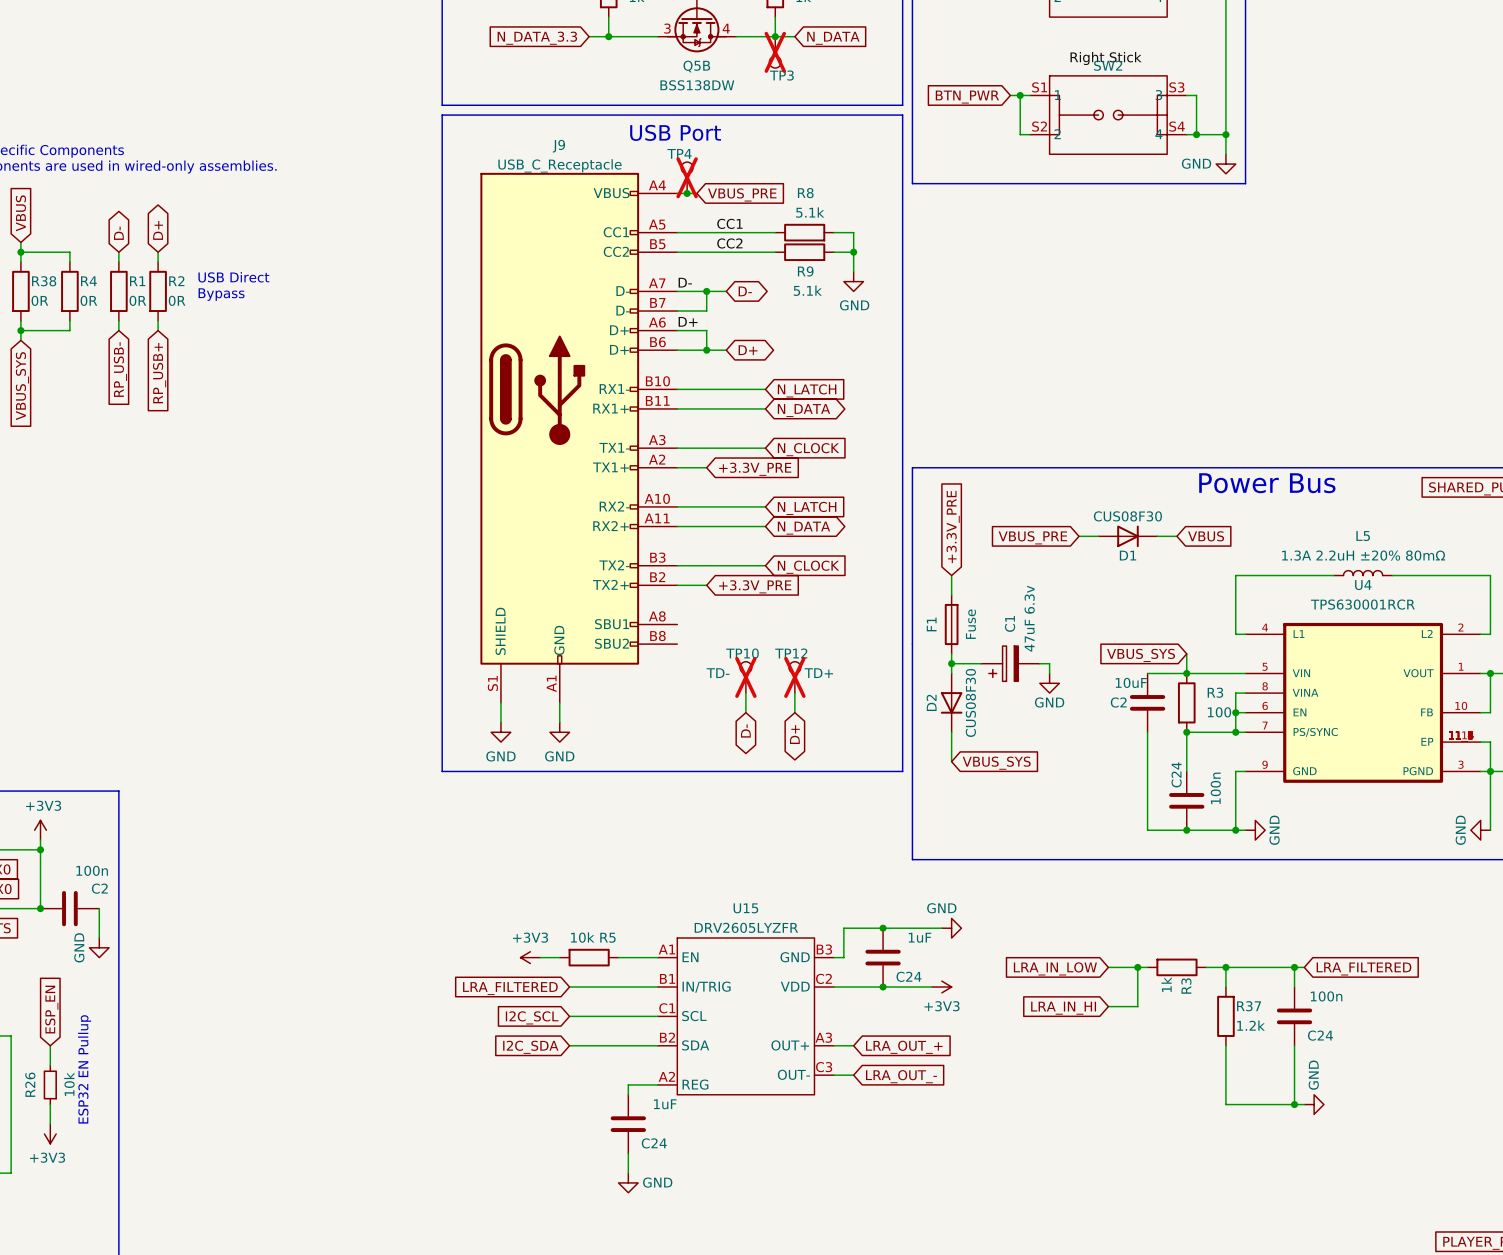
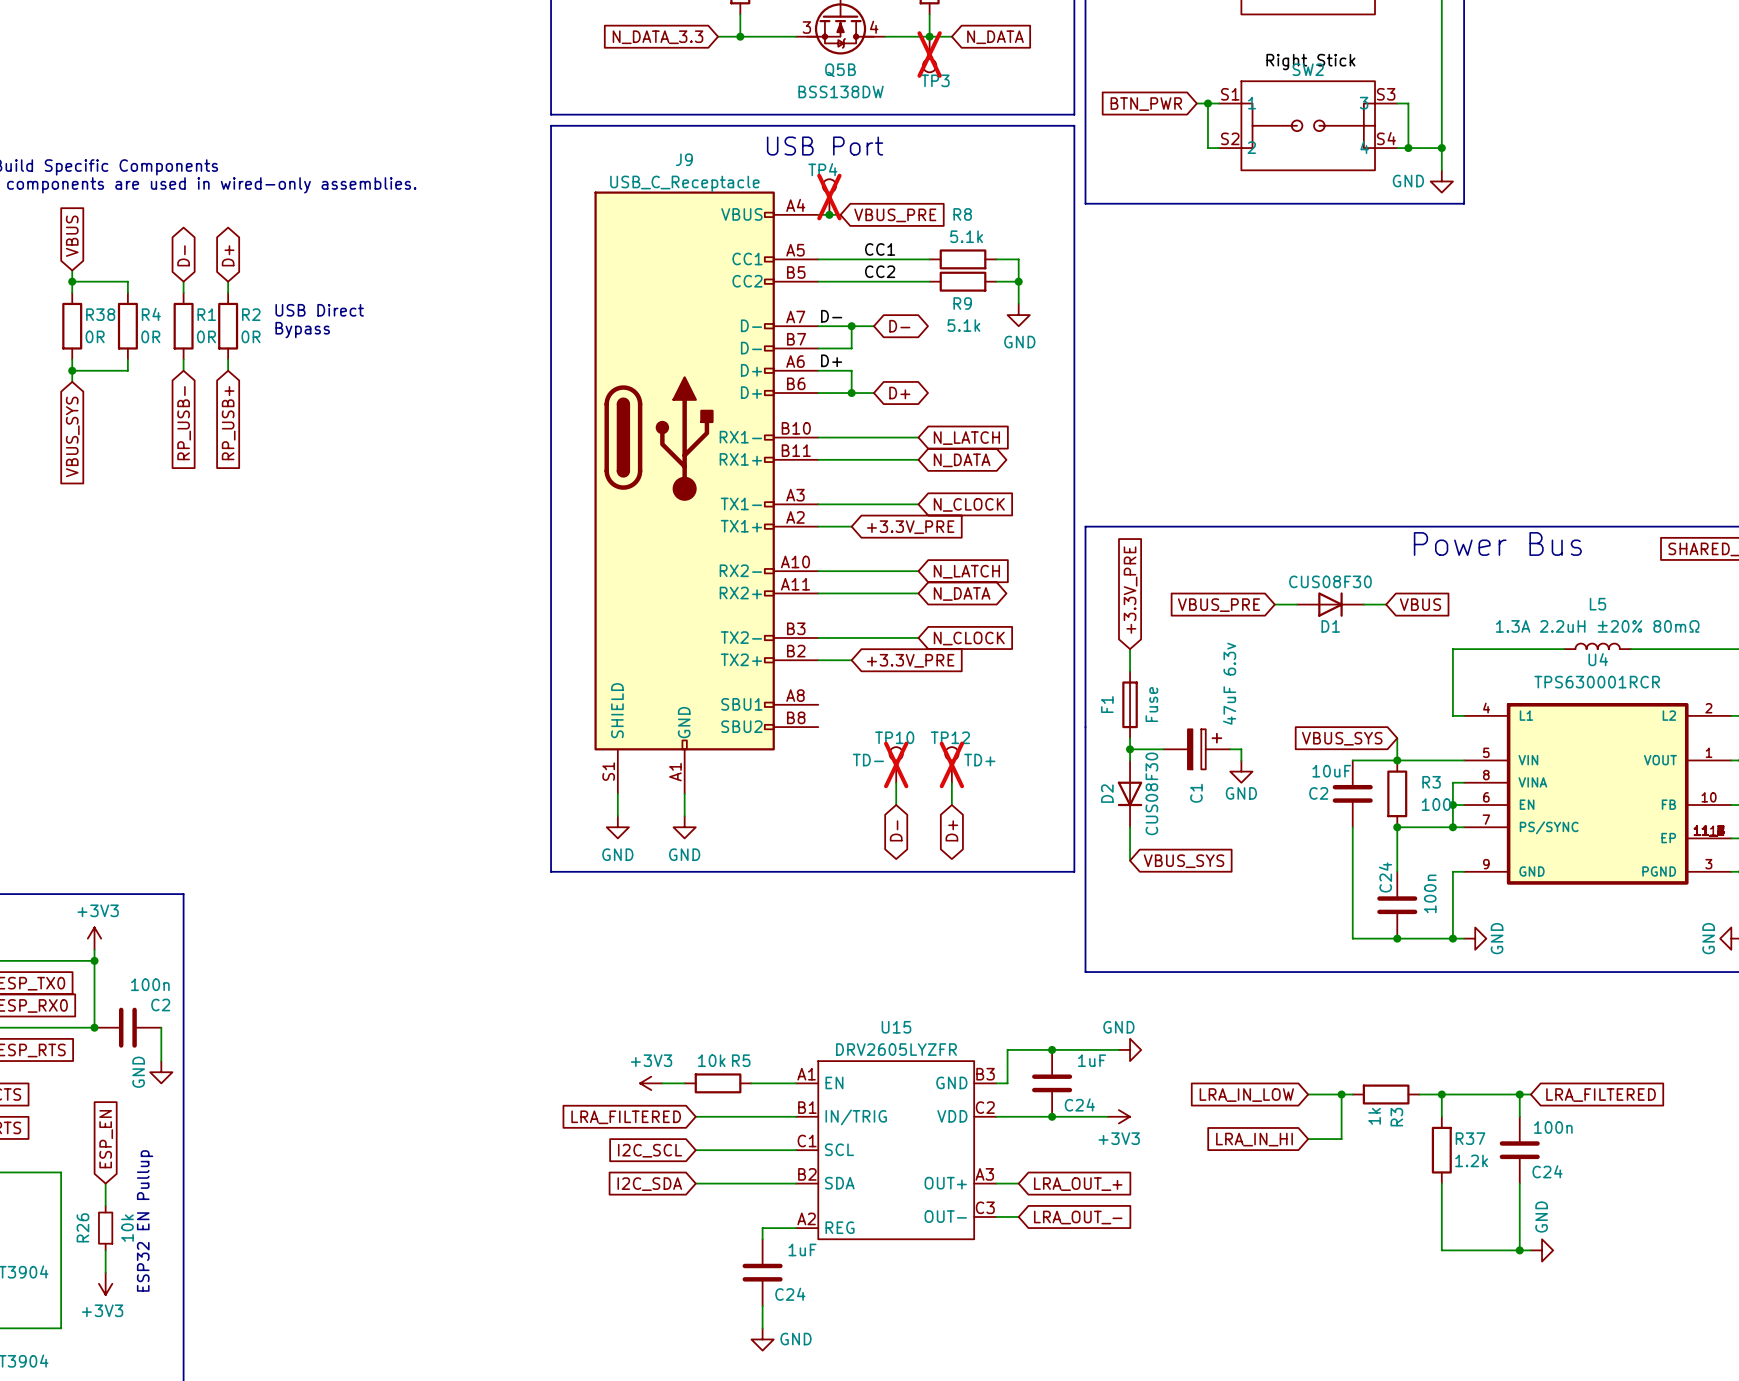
C1 value position: 47uF 6.3v (1029, 618) -> 47uF 6.3v (1229, 683)
C1 rotation: 0° (1003, 663) -> 180° (1204, 749)

